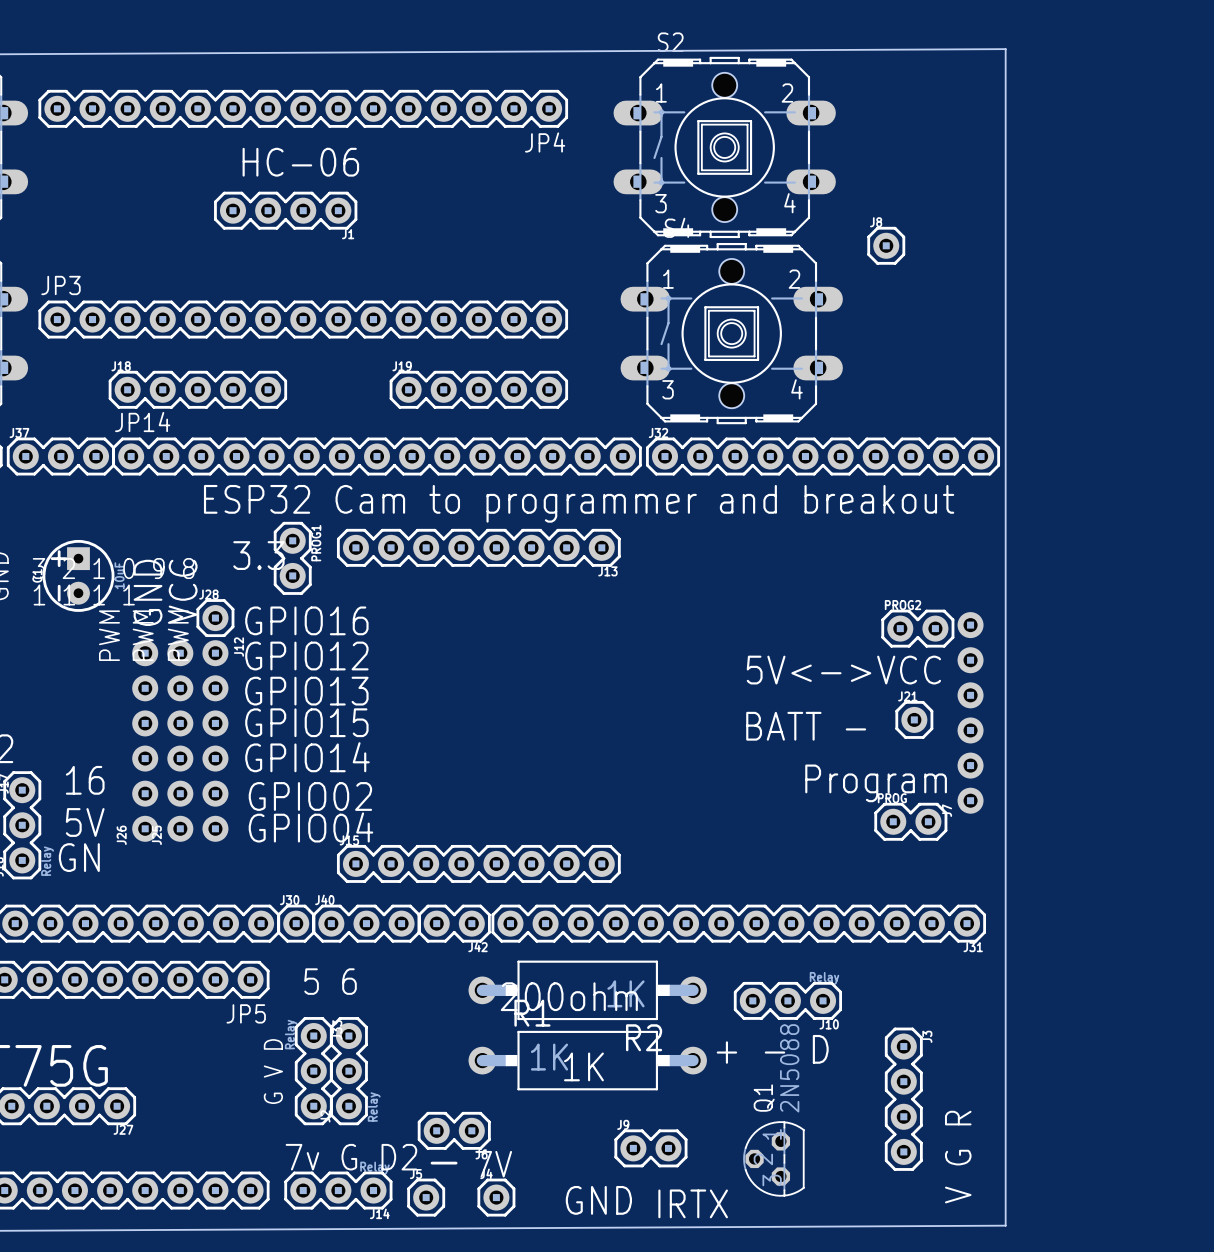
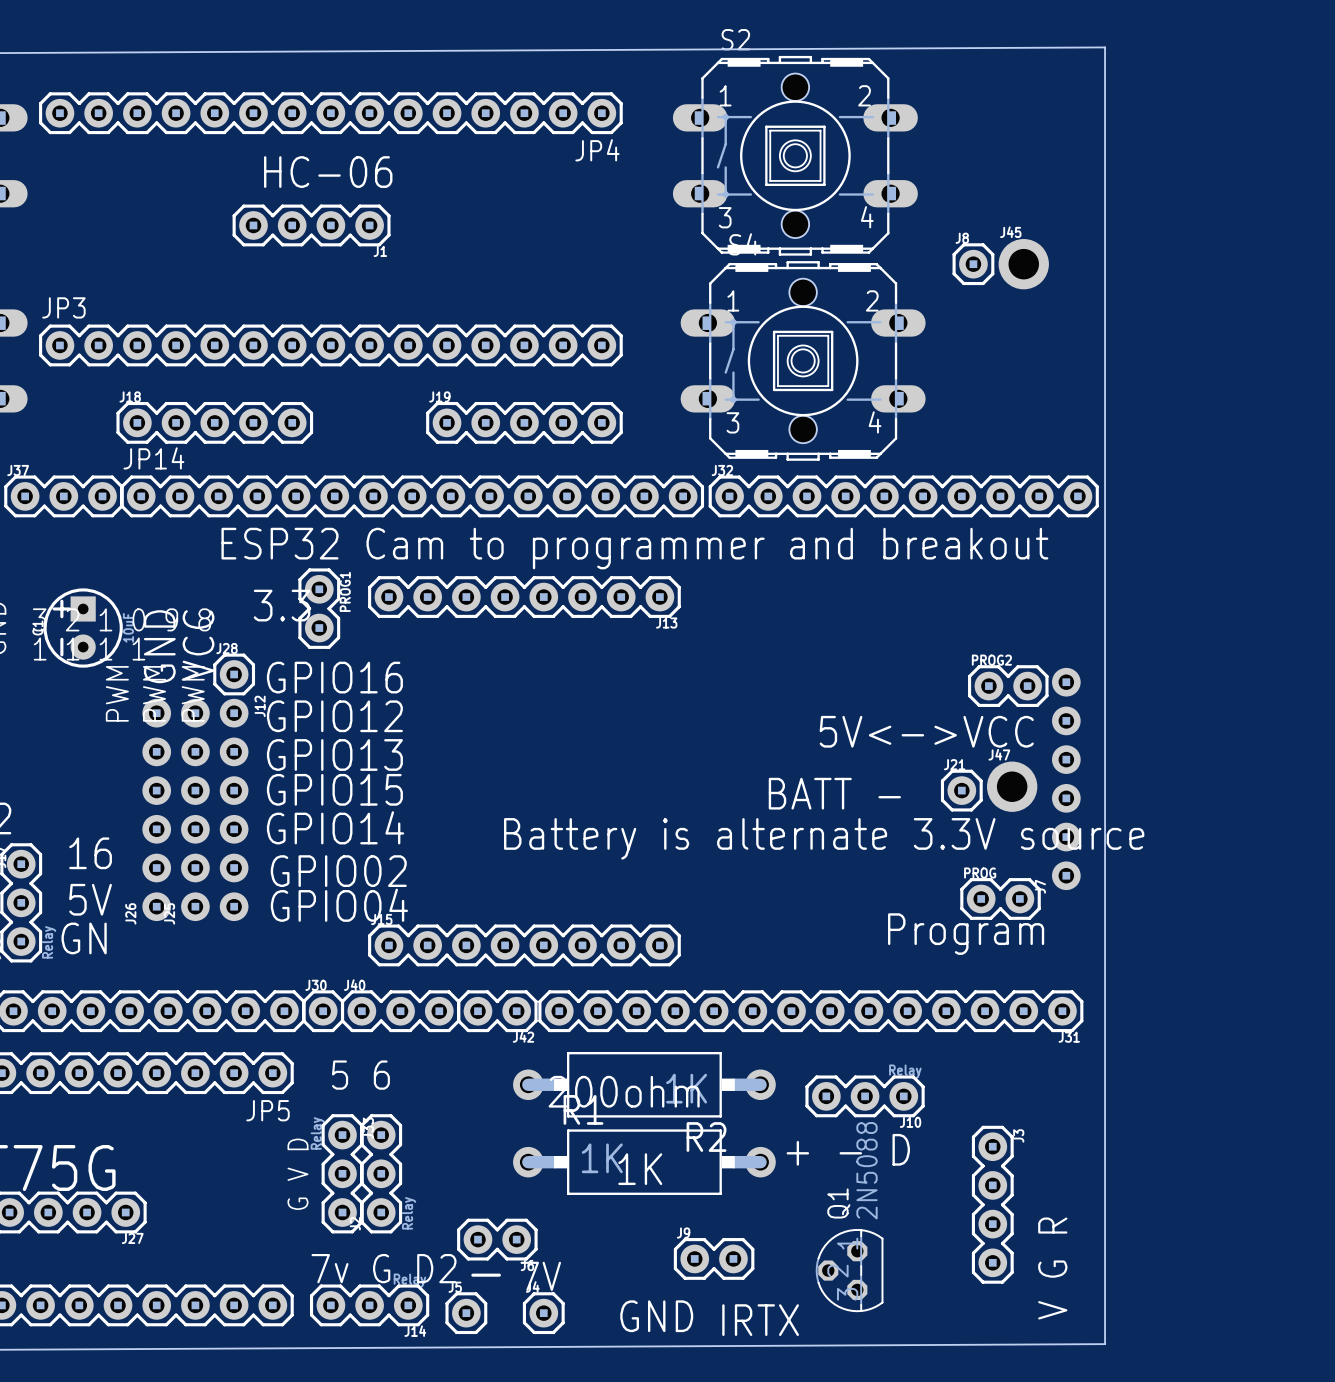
J45: none -> (1023, 264)
J21 position: (914, 719) -> (961, 790)
J47: none -> (1012, 786)
text position: BATT - (806, 726) -> BATT - (834, 793)
text: none -> Battery is alternate 3.3V source (824, 838)
text position: Program (876, 783) -> Program (966, 934)

